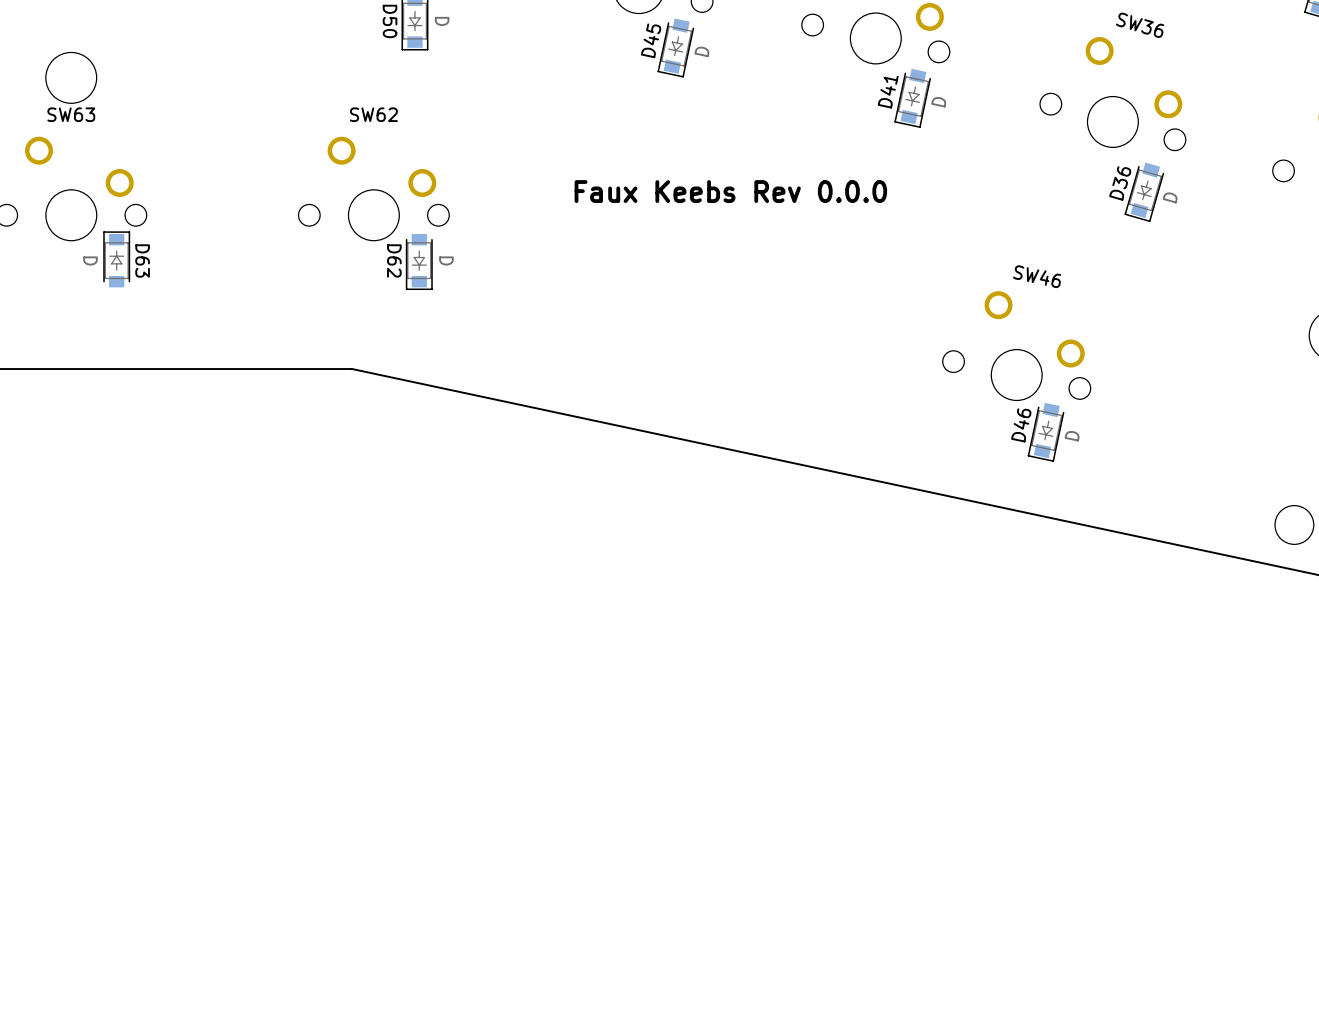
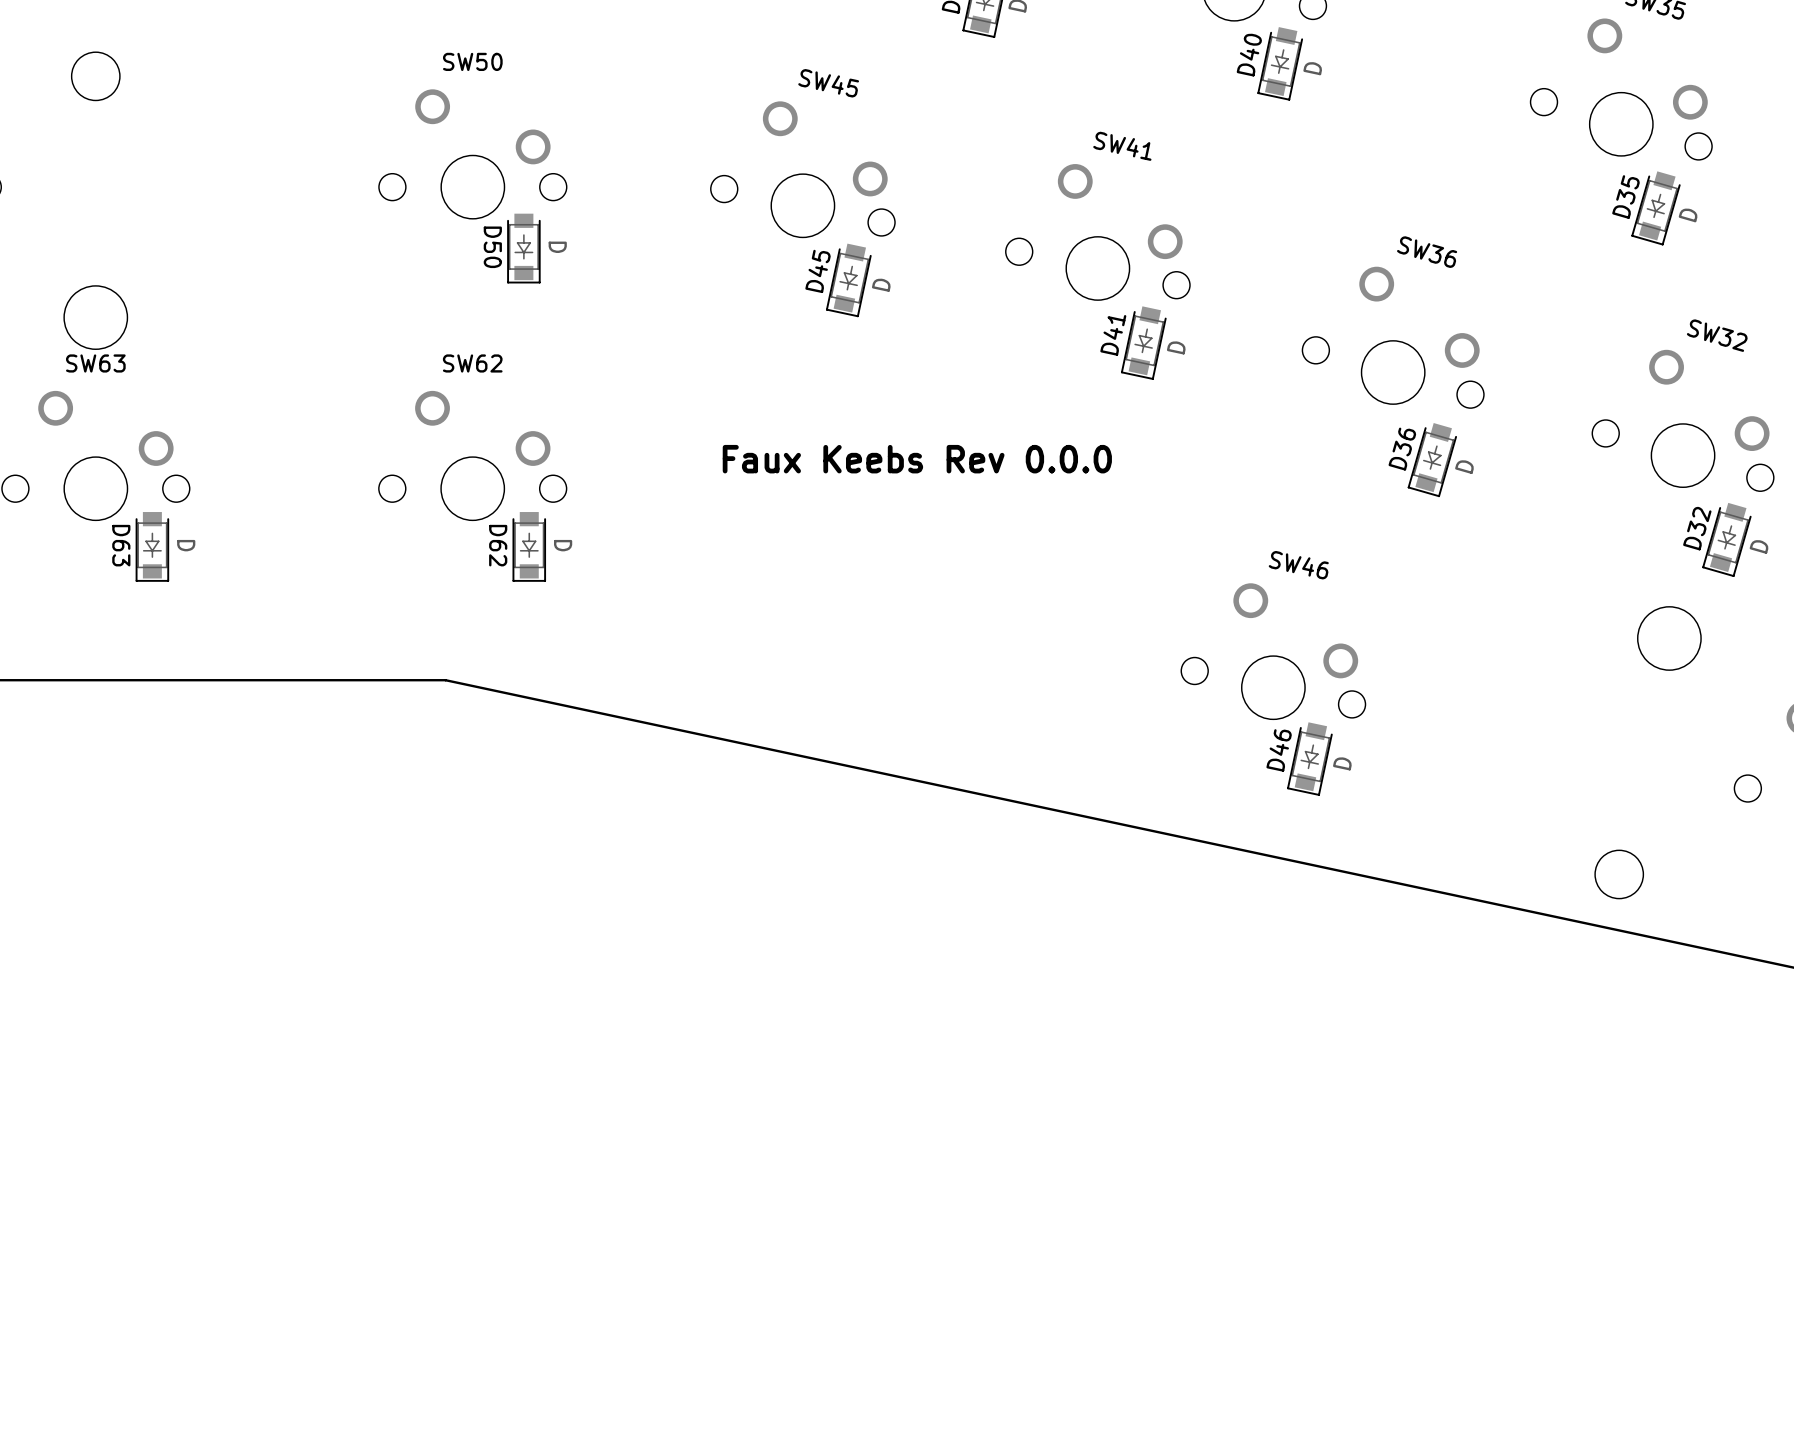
D63 rotation: 0° (116, 259) -> 180° (152, 546)

